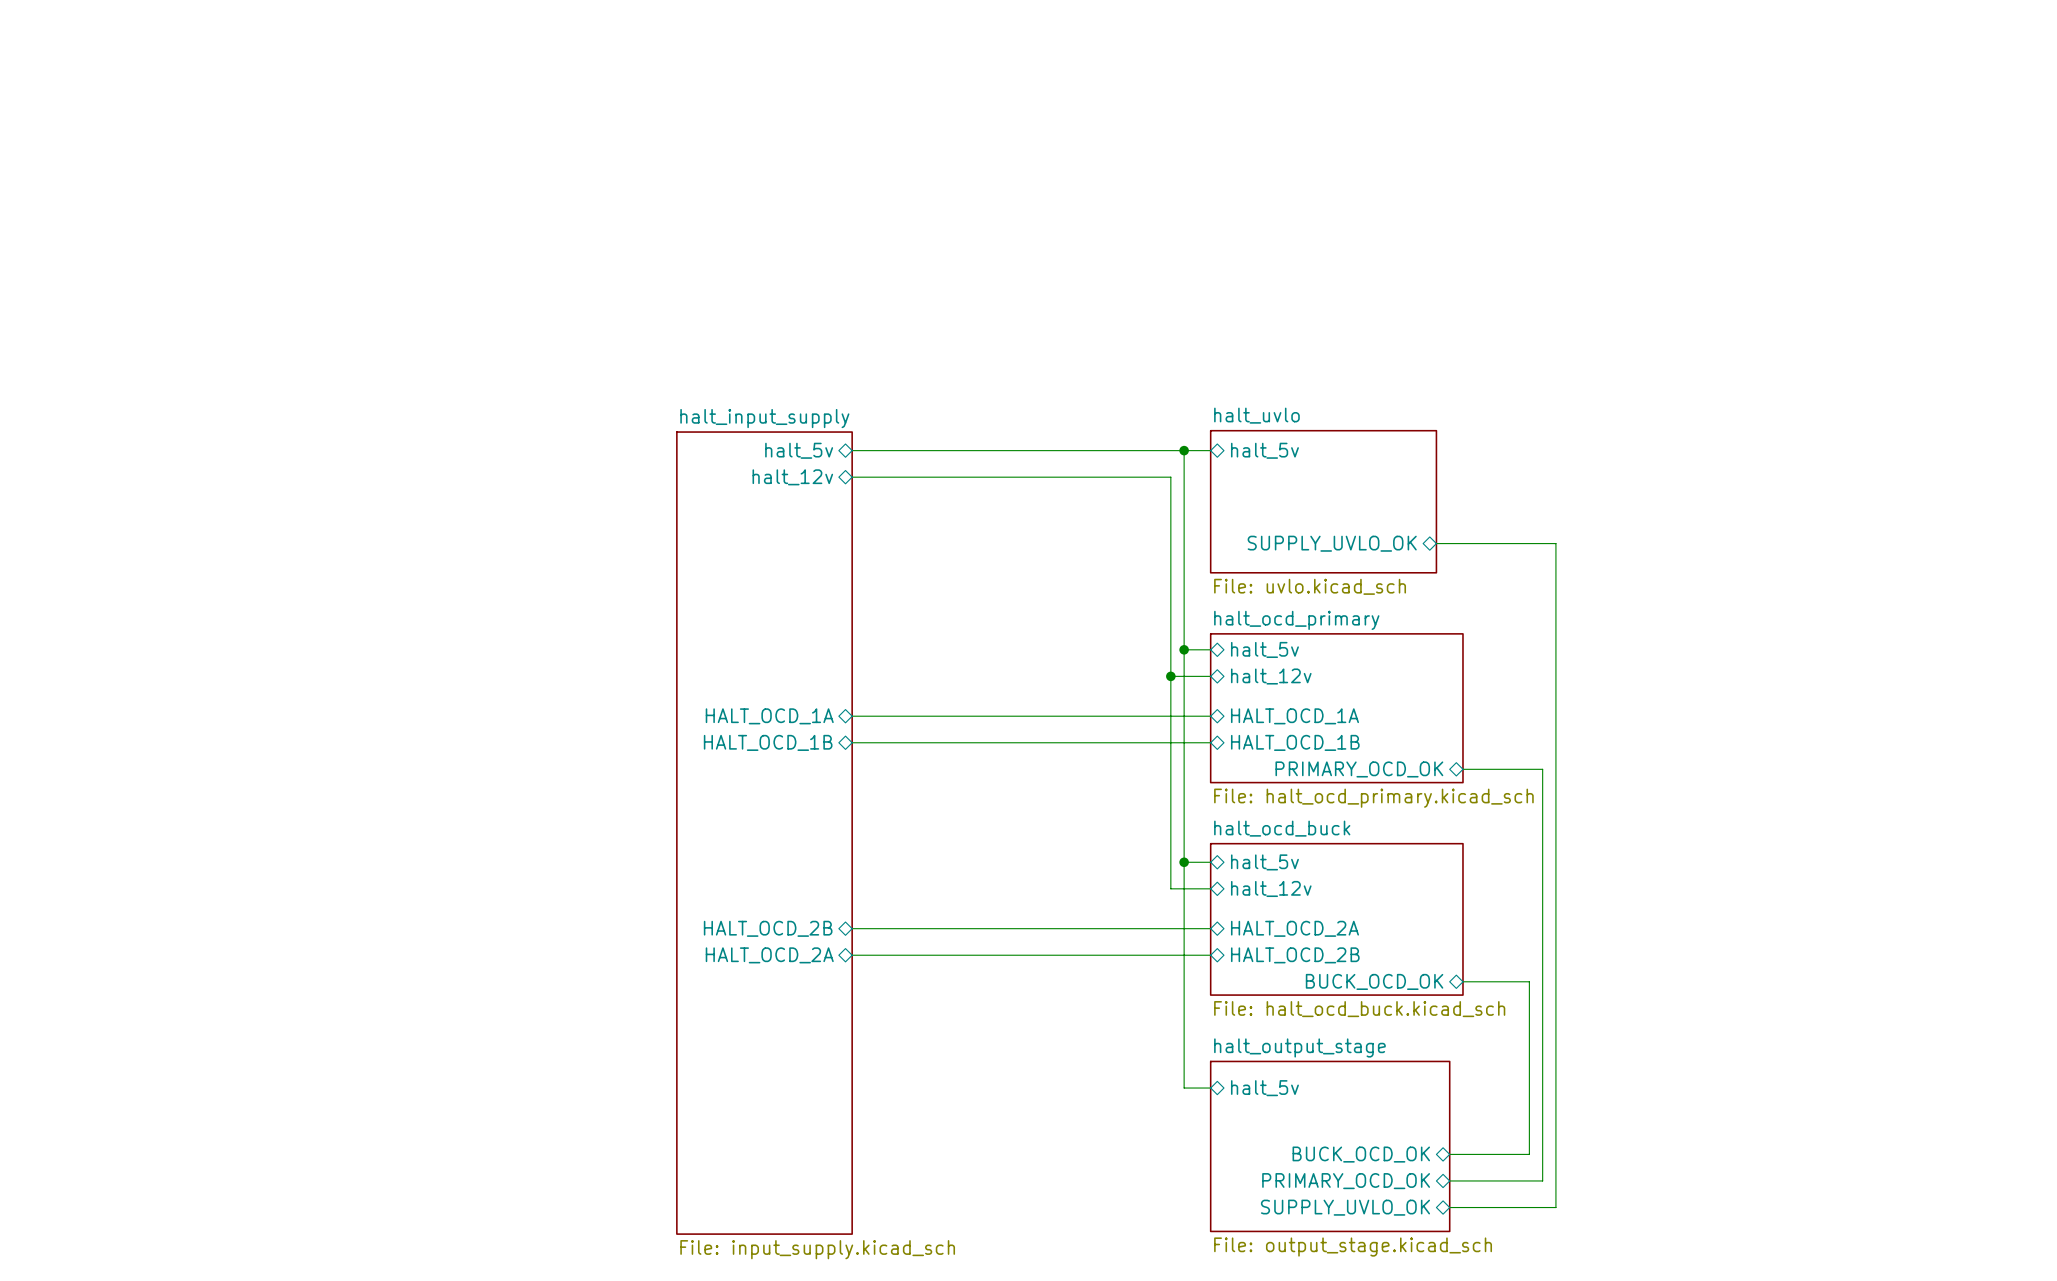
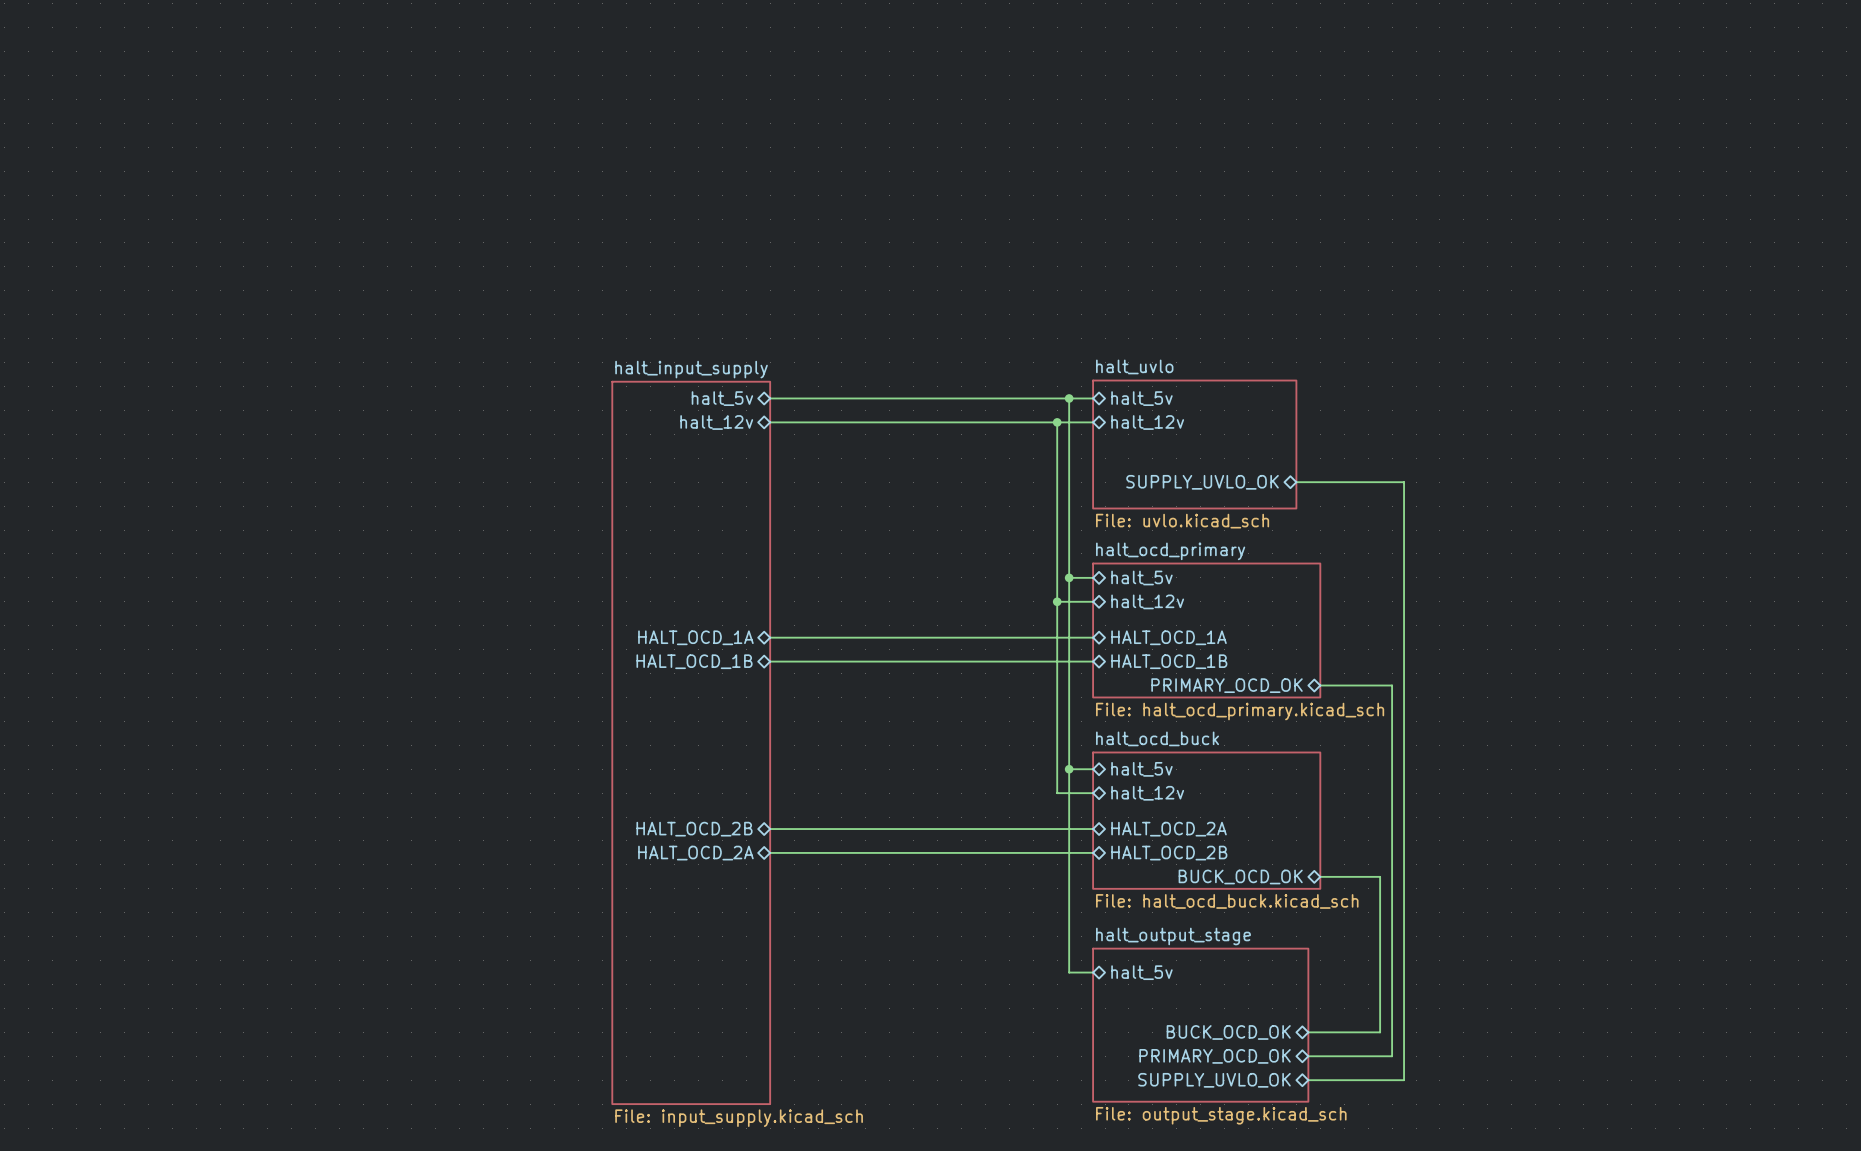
wire: none -> (1057, 422) (1093, 422)
junction: none -> (1057, 422)
sheet pin: none -> halt_12v (1147, 422)

